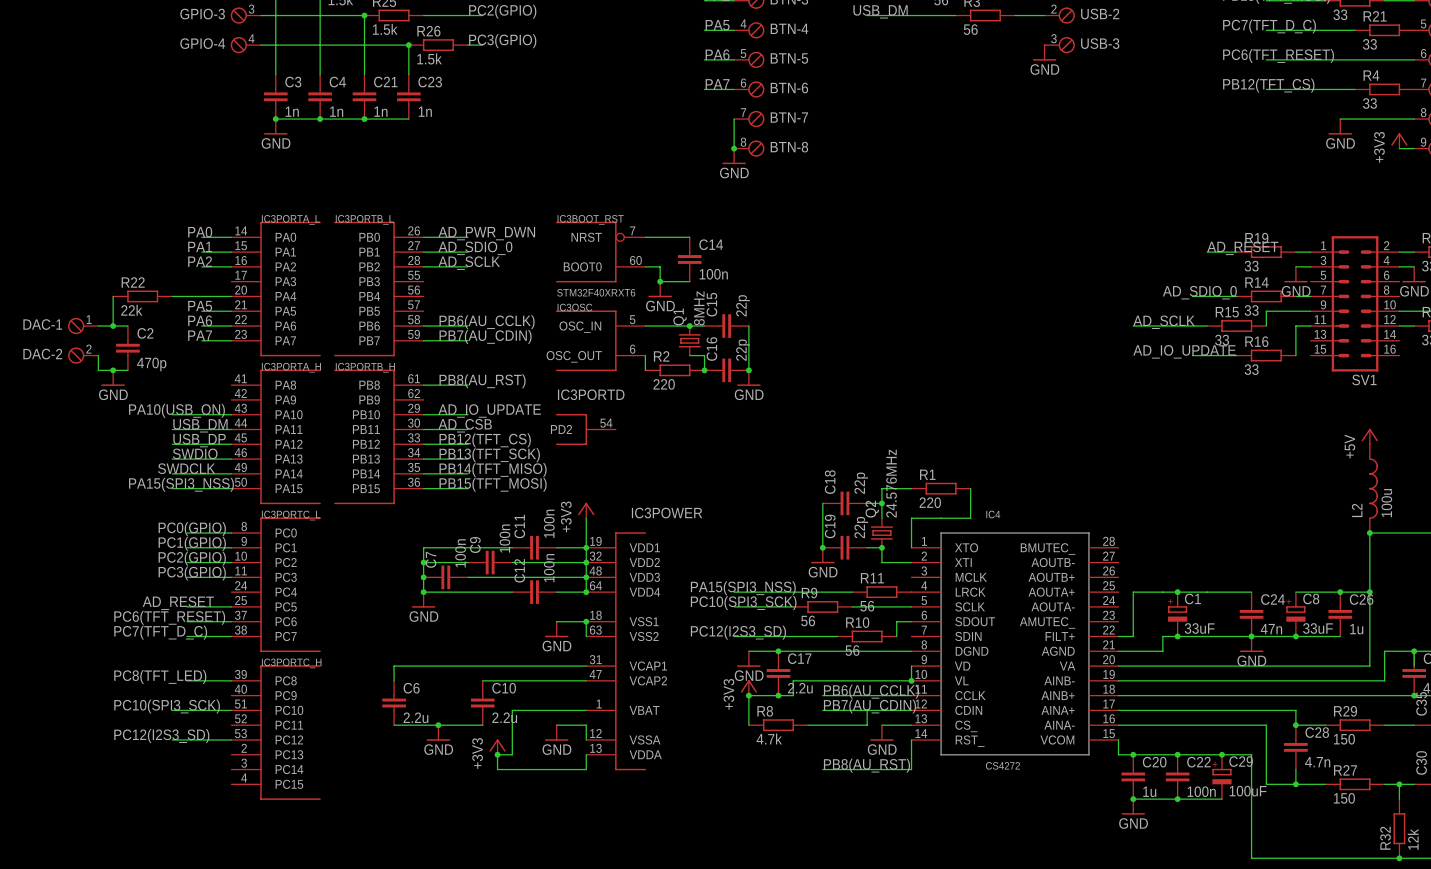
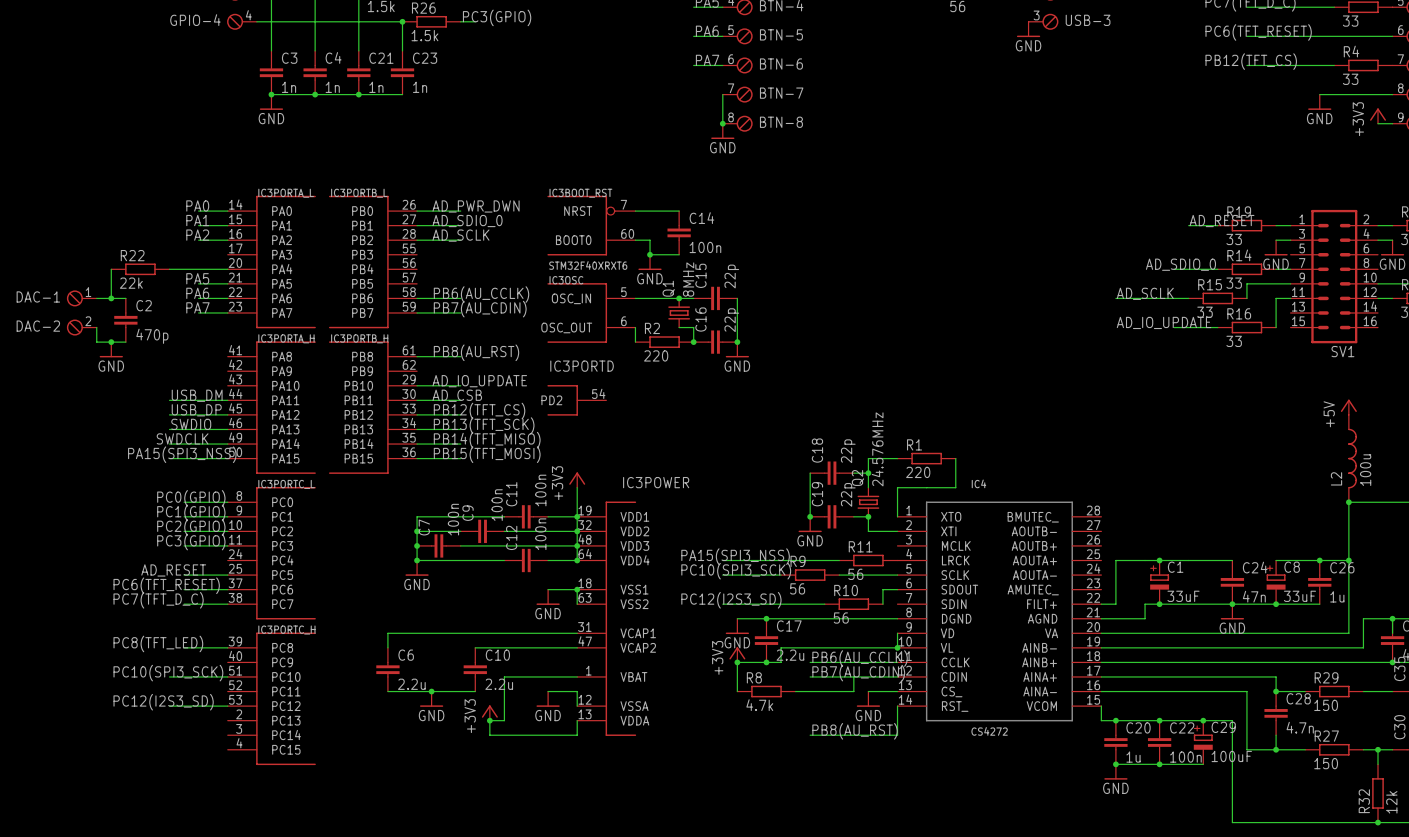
label: PA10(USB_ON) (176, 410) -> none
wire: (172, 414) (231, 414) -> none

